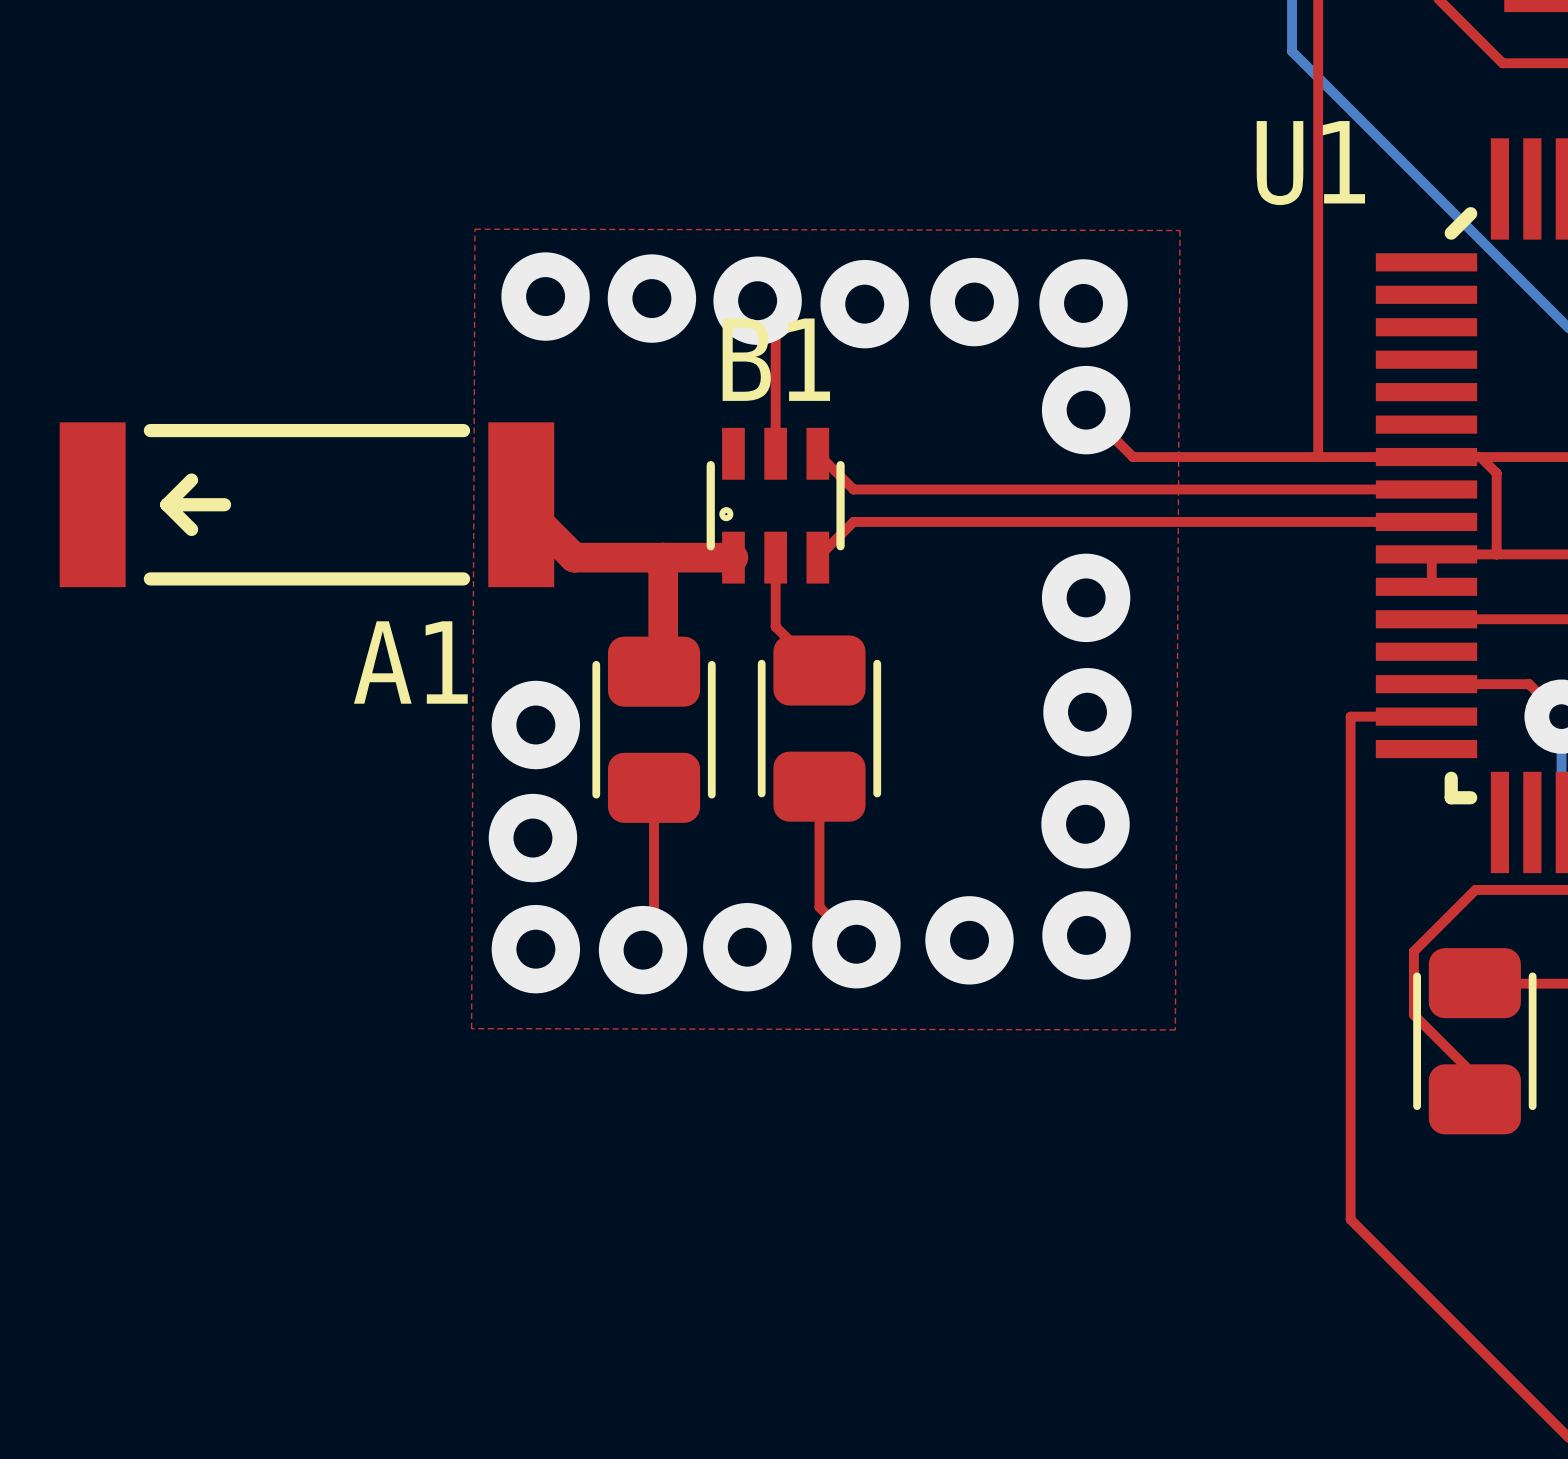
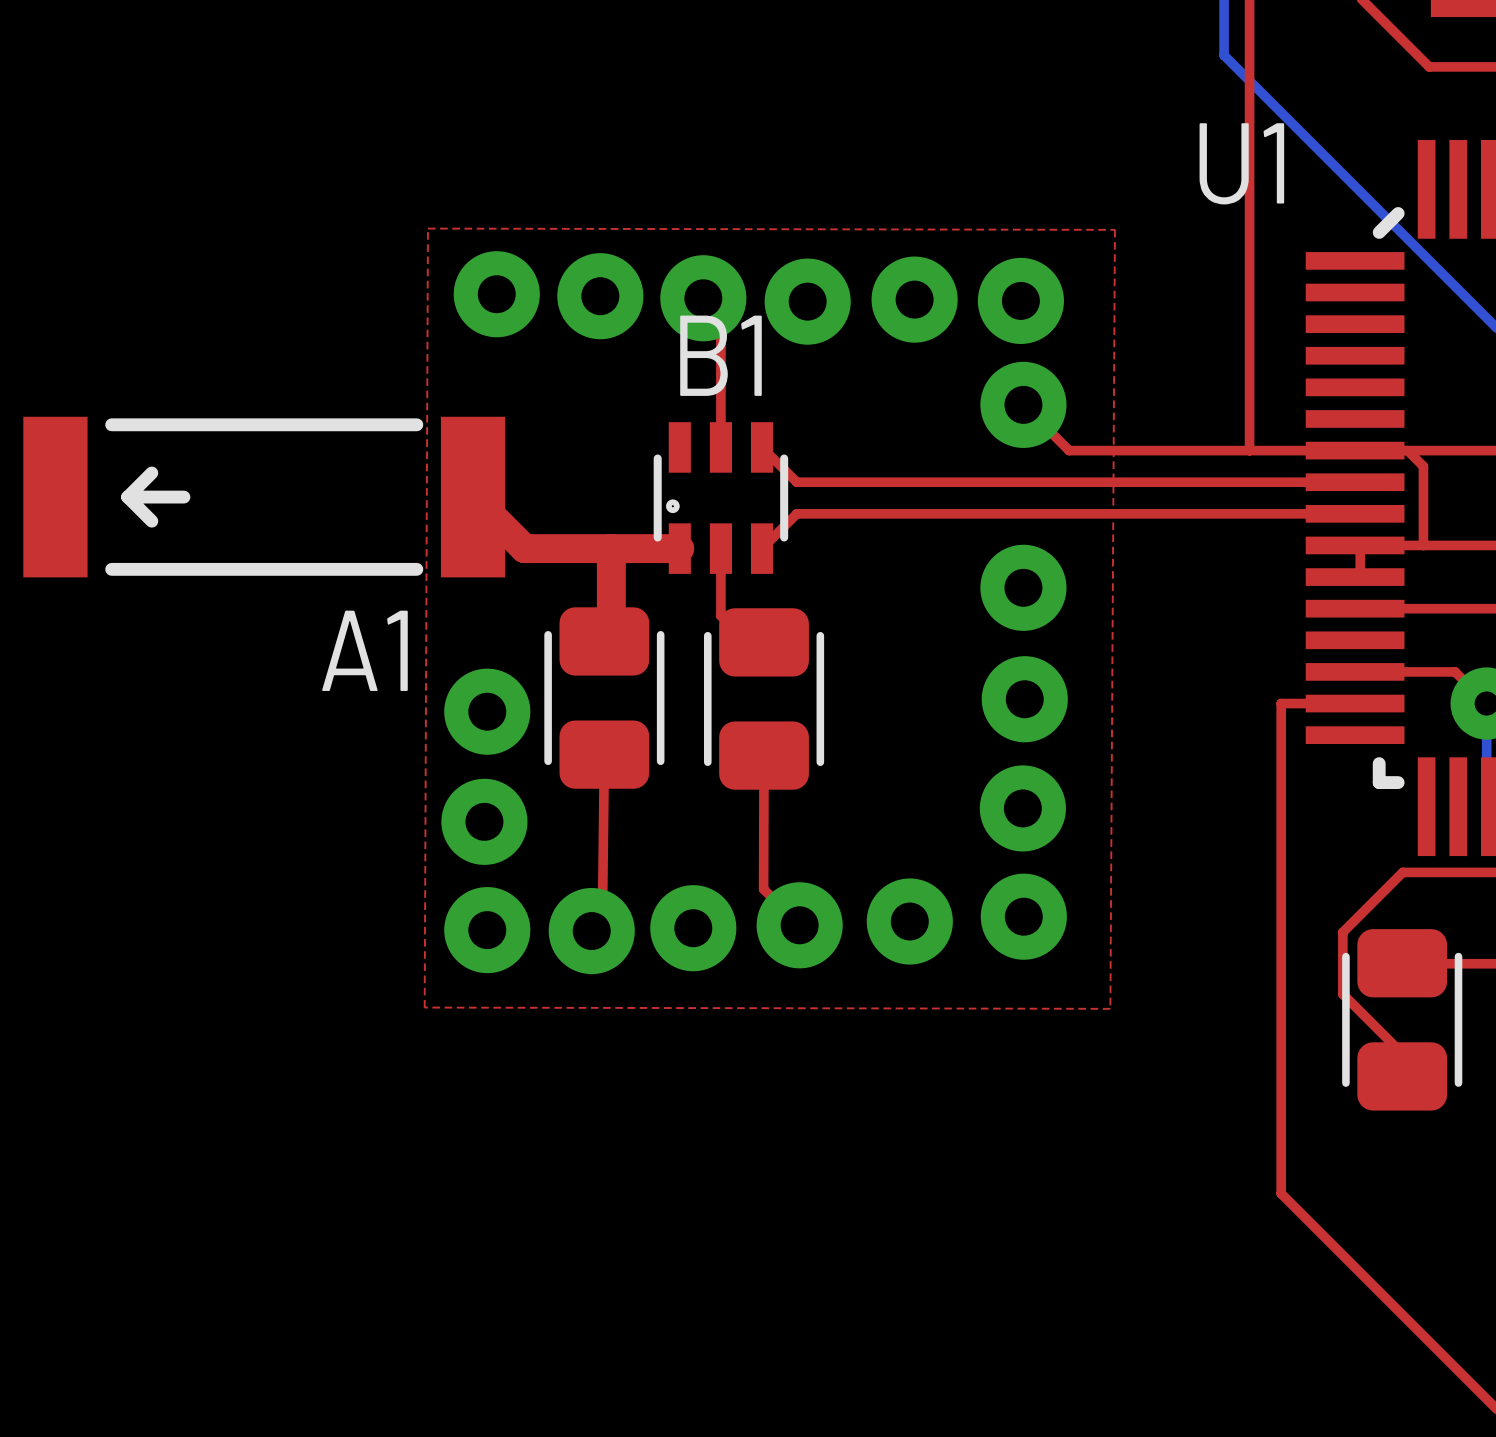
part position: (819, 728) -> (764, 698)
part position: (654, 729) -> (604, 698)
top track: (819, 786) (819, 907) -> (764, 755) (763, 889)
top track: (654, 787) (654, 939) -> (604, 754) (602, 920)

